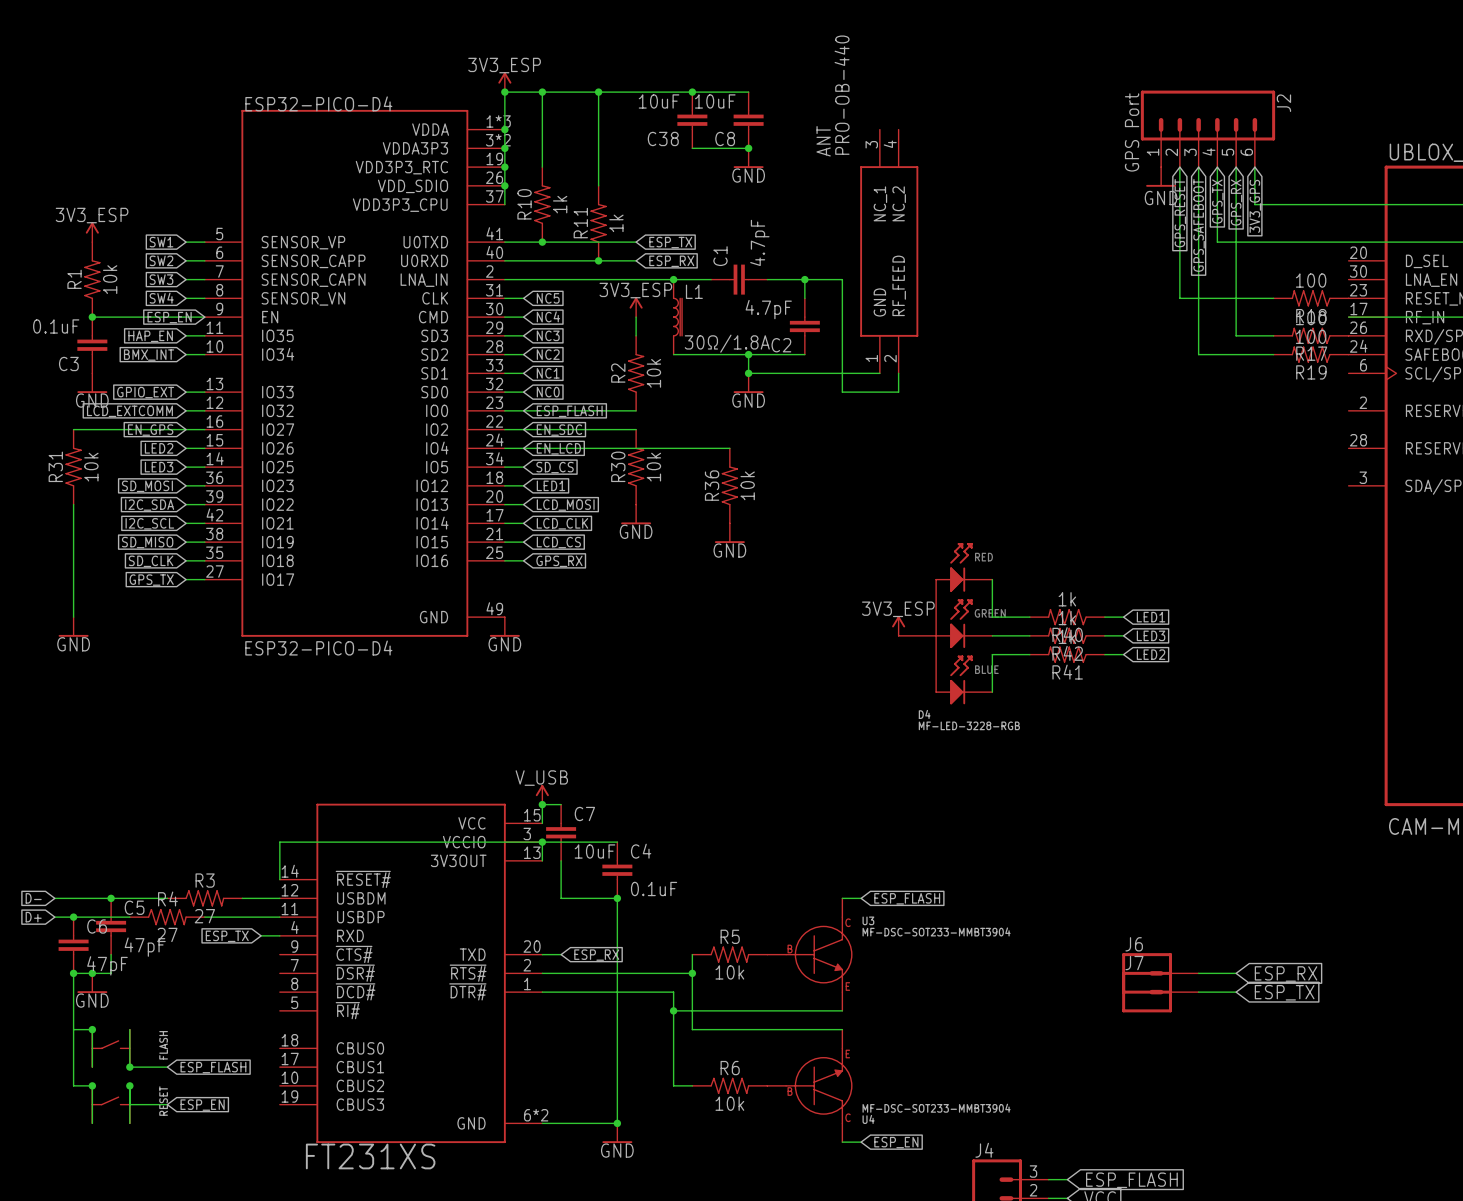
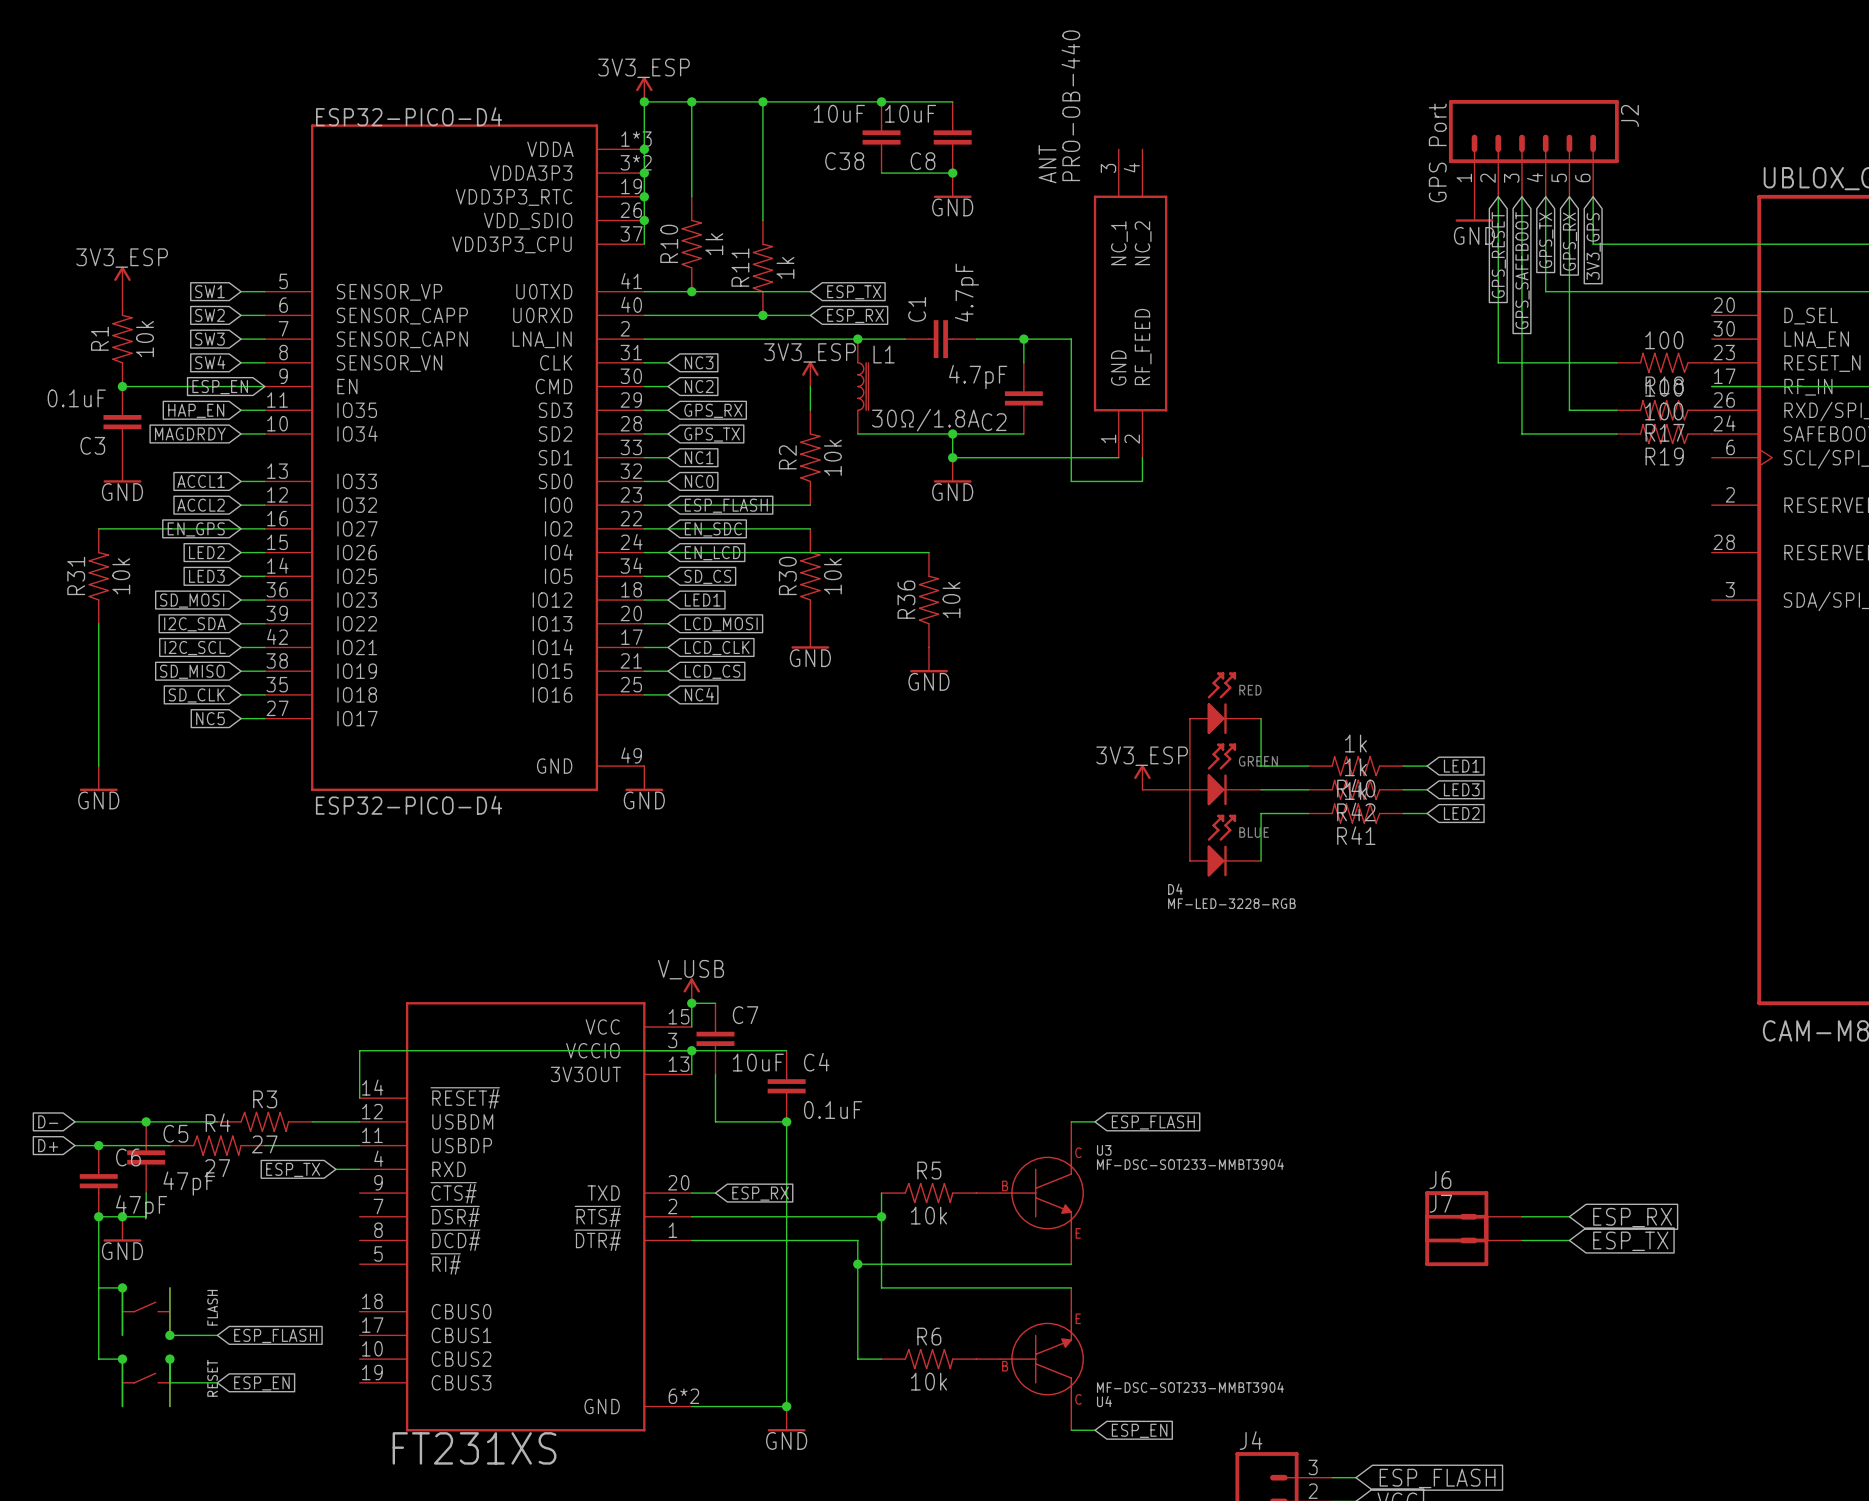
global label: NC5 (548, 298) -> NC3 (699, 362)
global label: NC4 (548, 316) -> NC2 (699, 386)
global label: NC3 (548, 335) -> GPS_RX (713, 410)
global label: NC2 (548, 354) -> GPS_TX (712, 434)
global label: BMX_INT (149, 355) -> MAGDRDY (190, 433)
global label: GPIO_EXT (145, 392) -> ACCL1 (201, 481)
global label: LCD_EXTCOMM (129, 411) -> ACCL2 (201, 505)
global label: GPS_RX (559, 561) -> NC4 (699, 694)
global label: GPS_TX (151, 580) -> NC5 (210, 718)

